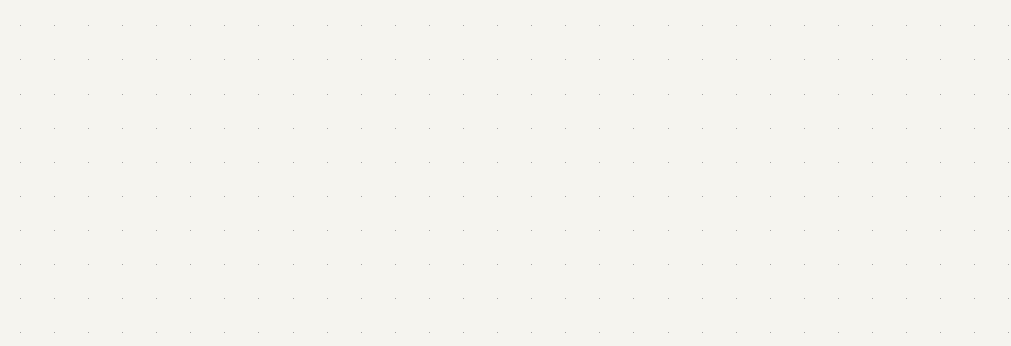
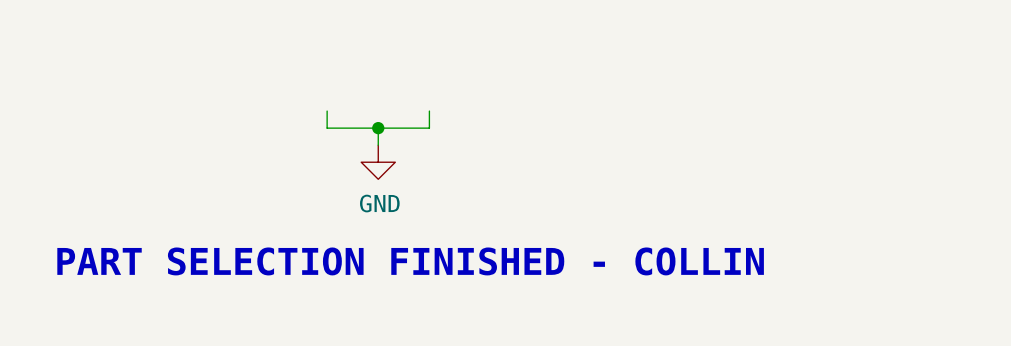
wire: none -> (327, 111) (327, 128) (429, 128) (429, 111)
wire: none -> (378, 128) (378, 145)
junction: none -> (378, 128)
power symbol: none -> GND (378, 162)
text: none -> PART SELECTION FINISHED - COLLIN (410, 261)

